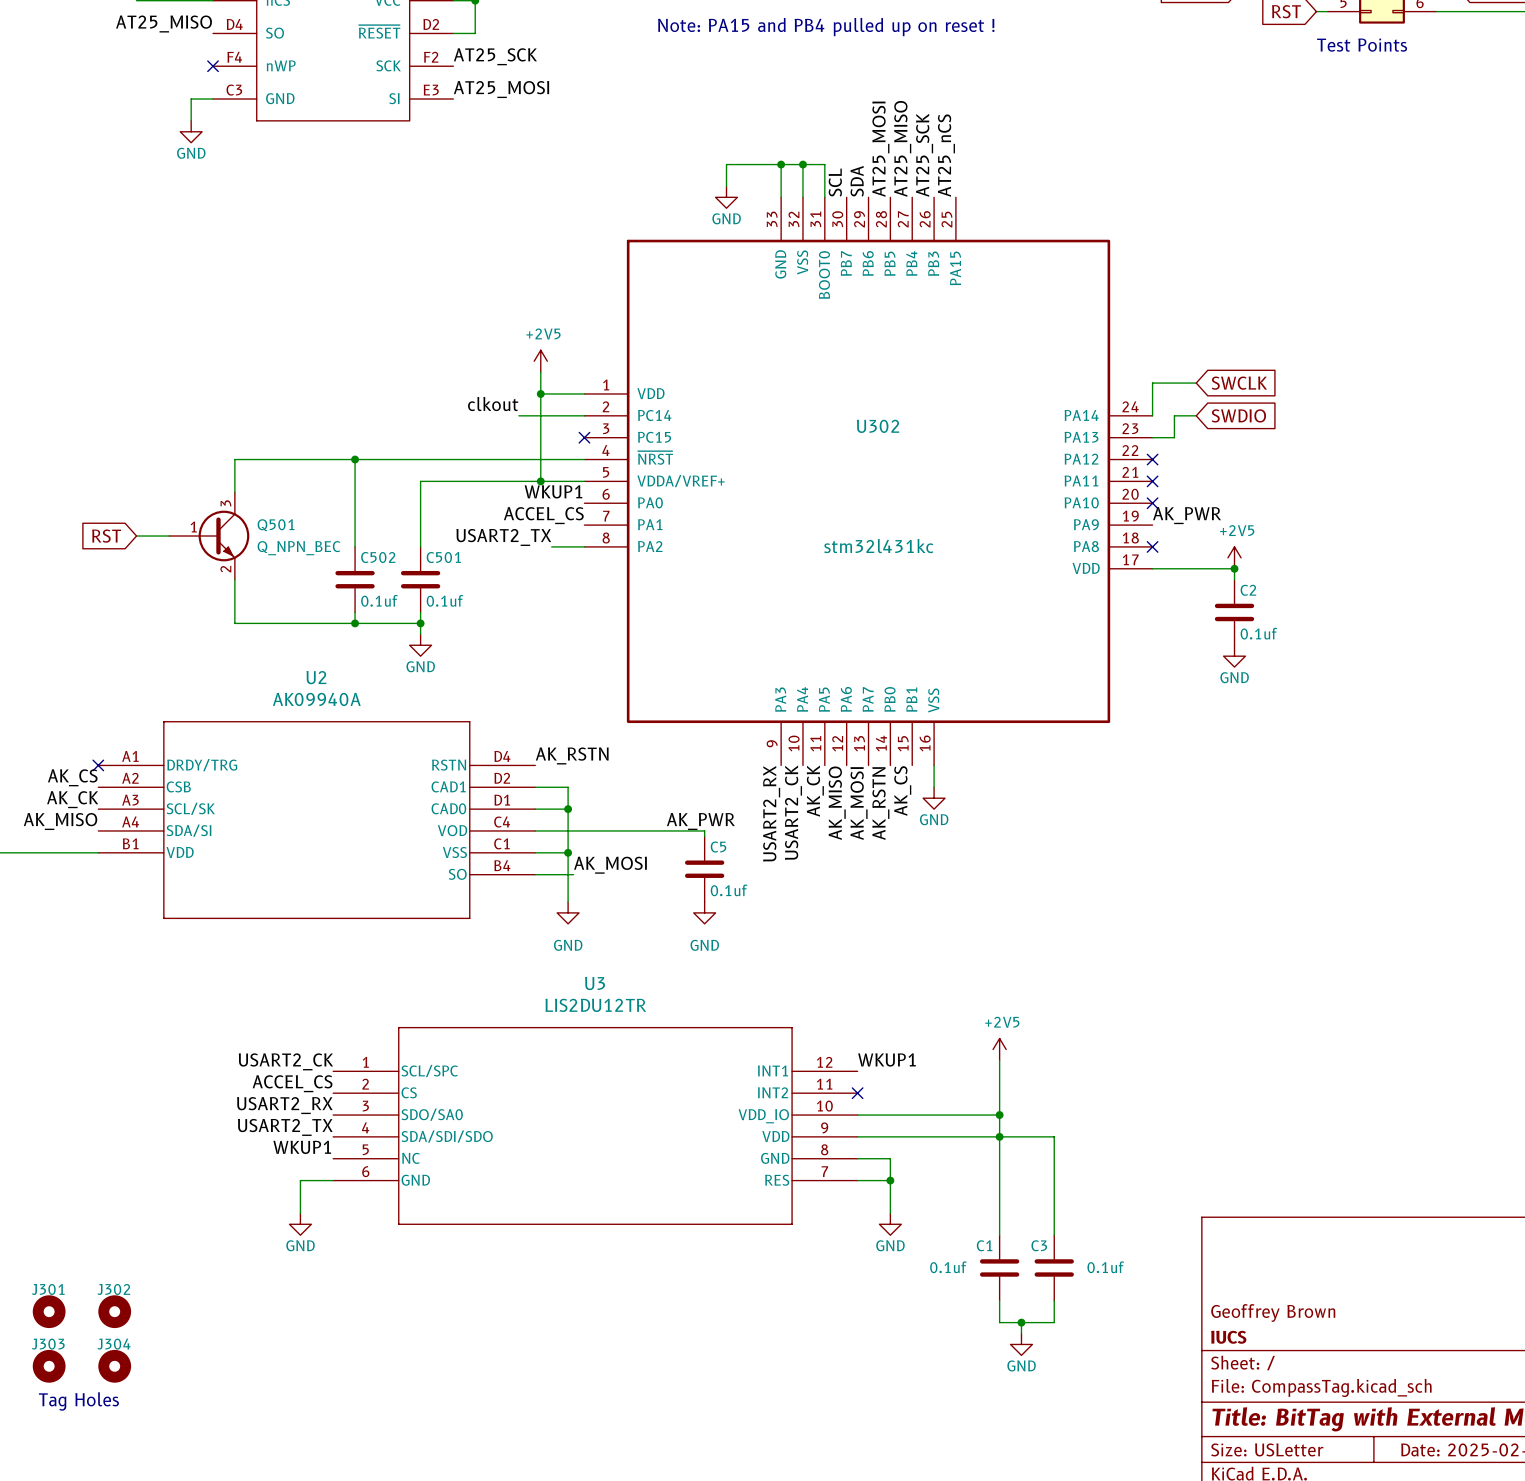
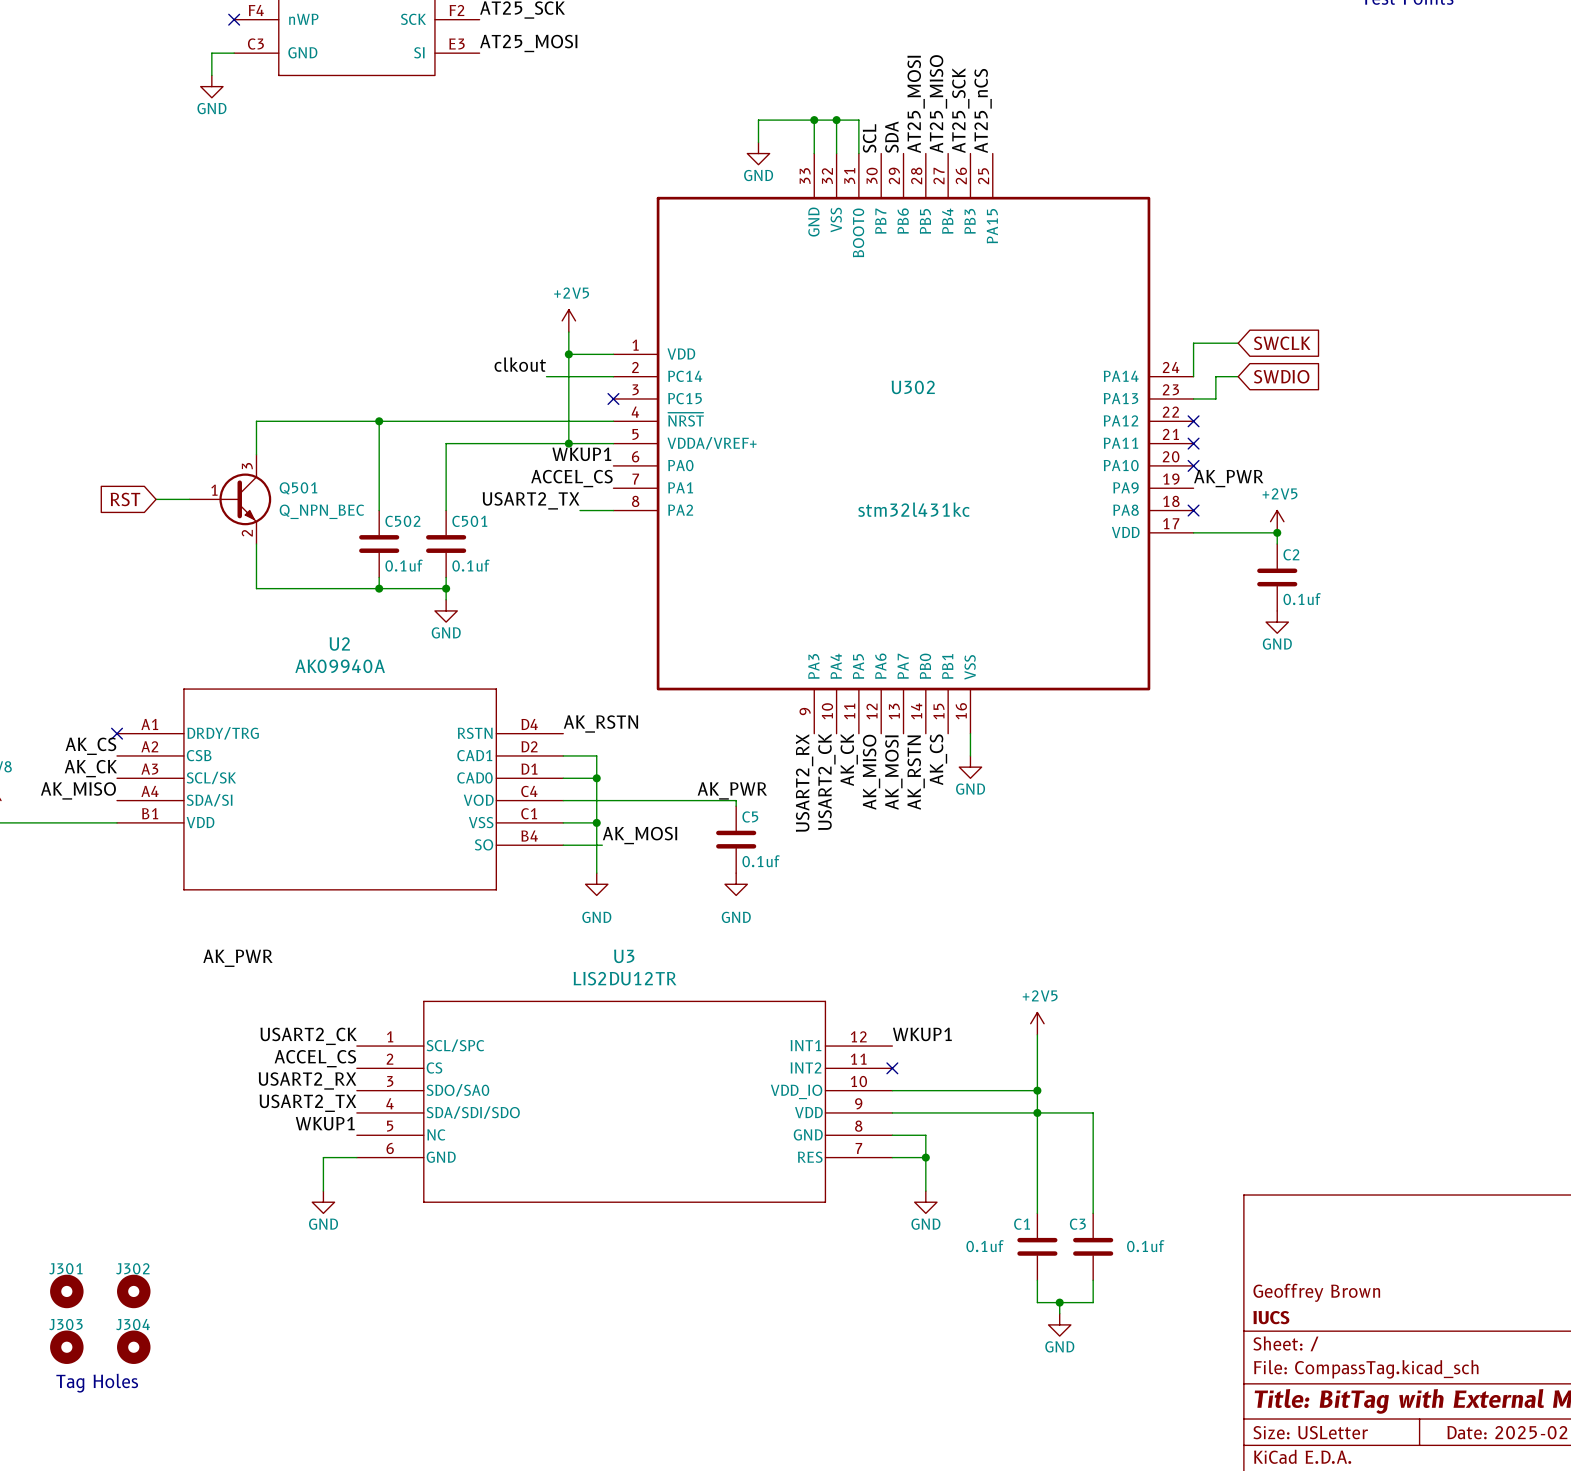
label: none -> AK_PWR (237, 958)

